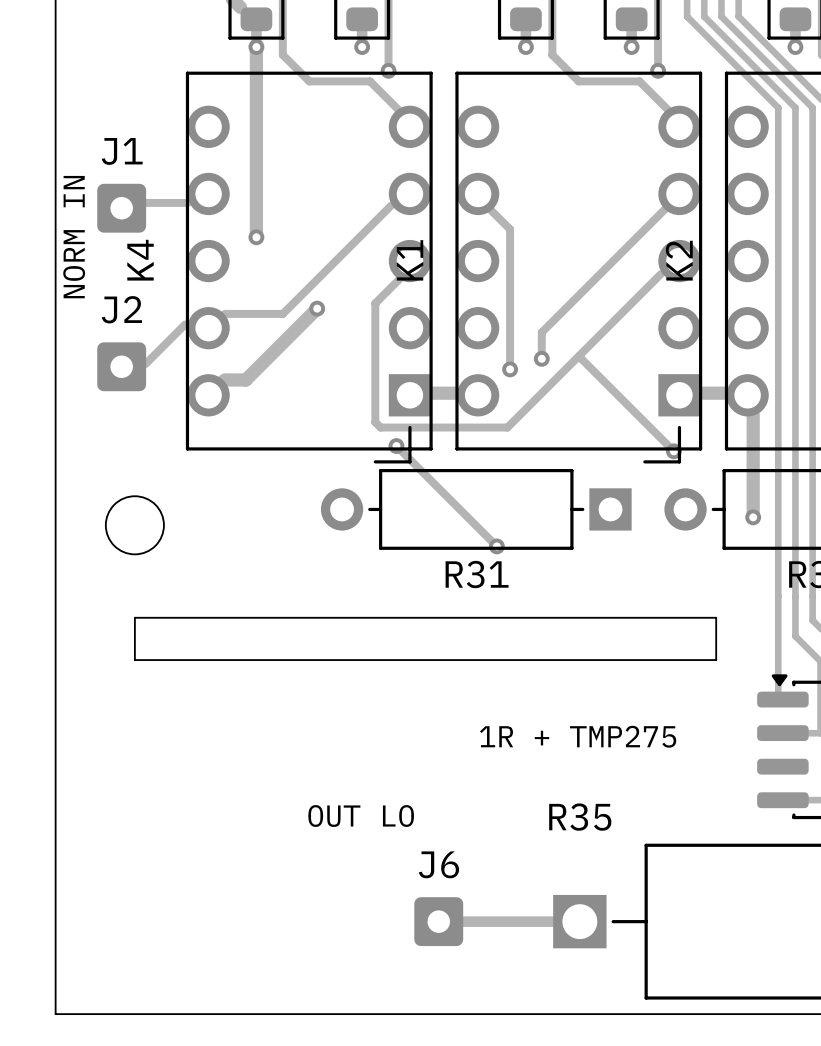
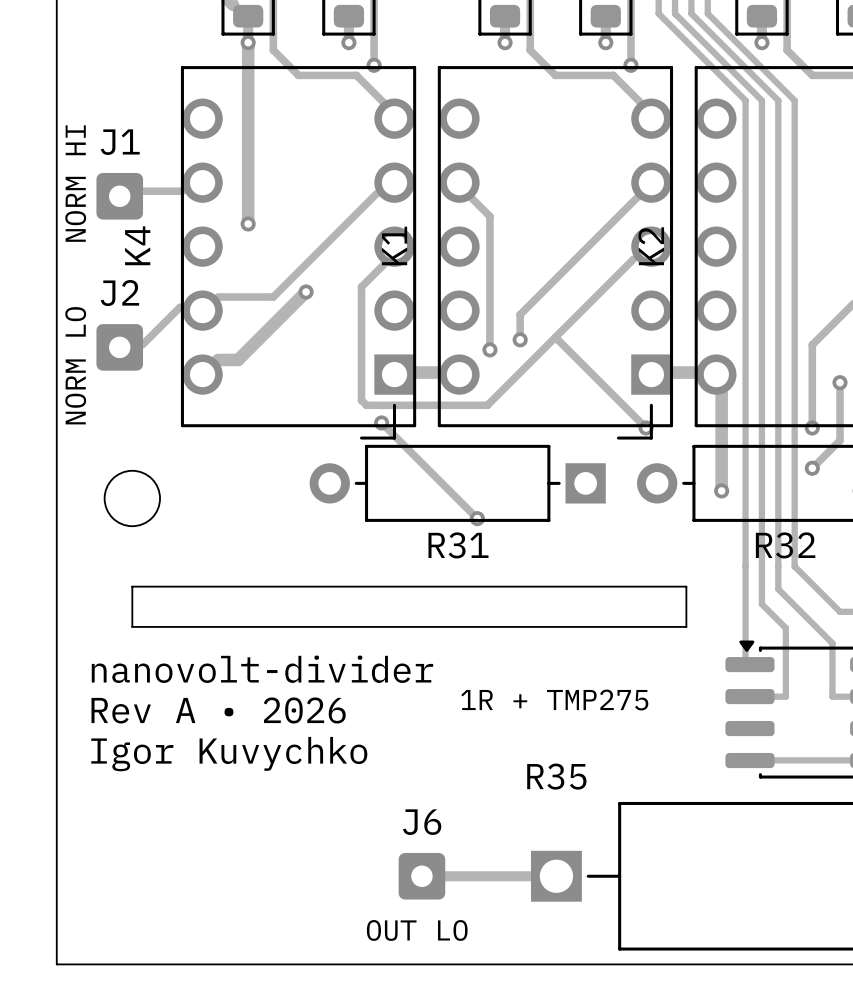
text: NORM IN (74, 237) -> NORM HI (75, 183)
text: none -> NORM LO (75, 365)
text: none -> nanovolt-divider (262, 669)
text: none -> Rev A • 2026 (218, 710)
text: none -> Igor Kuvychko (229, 754)
text position: OUT LO (361, 816) -> OUT LO (417, 930)

